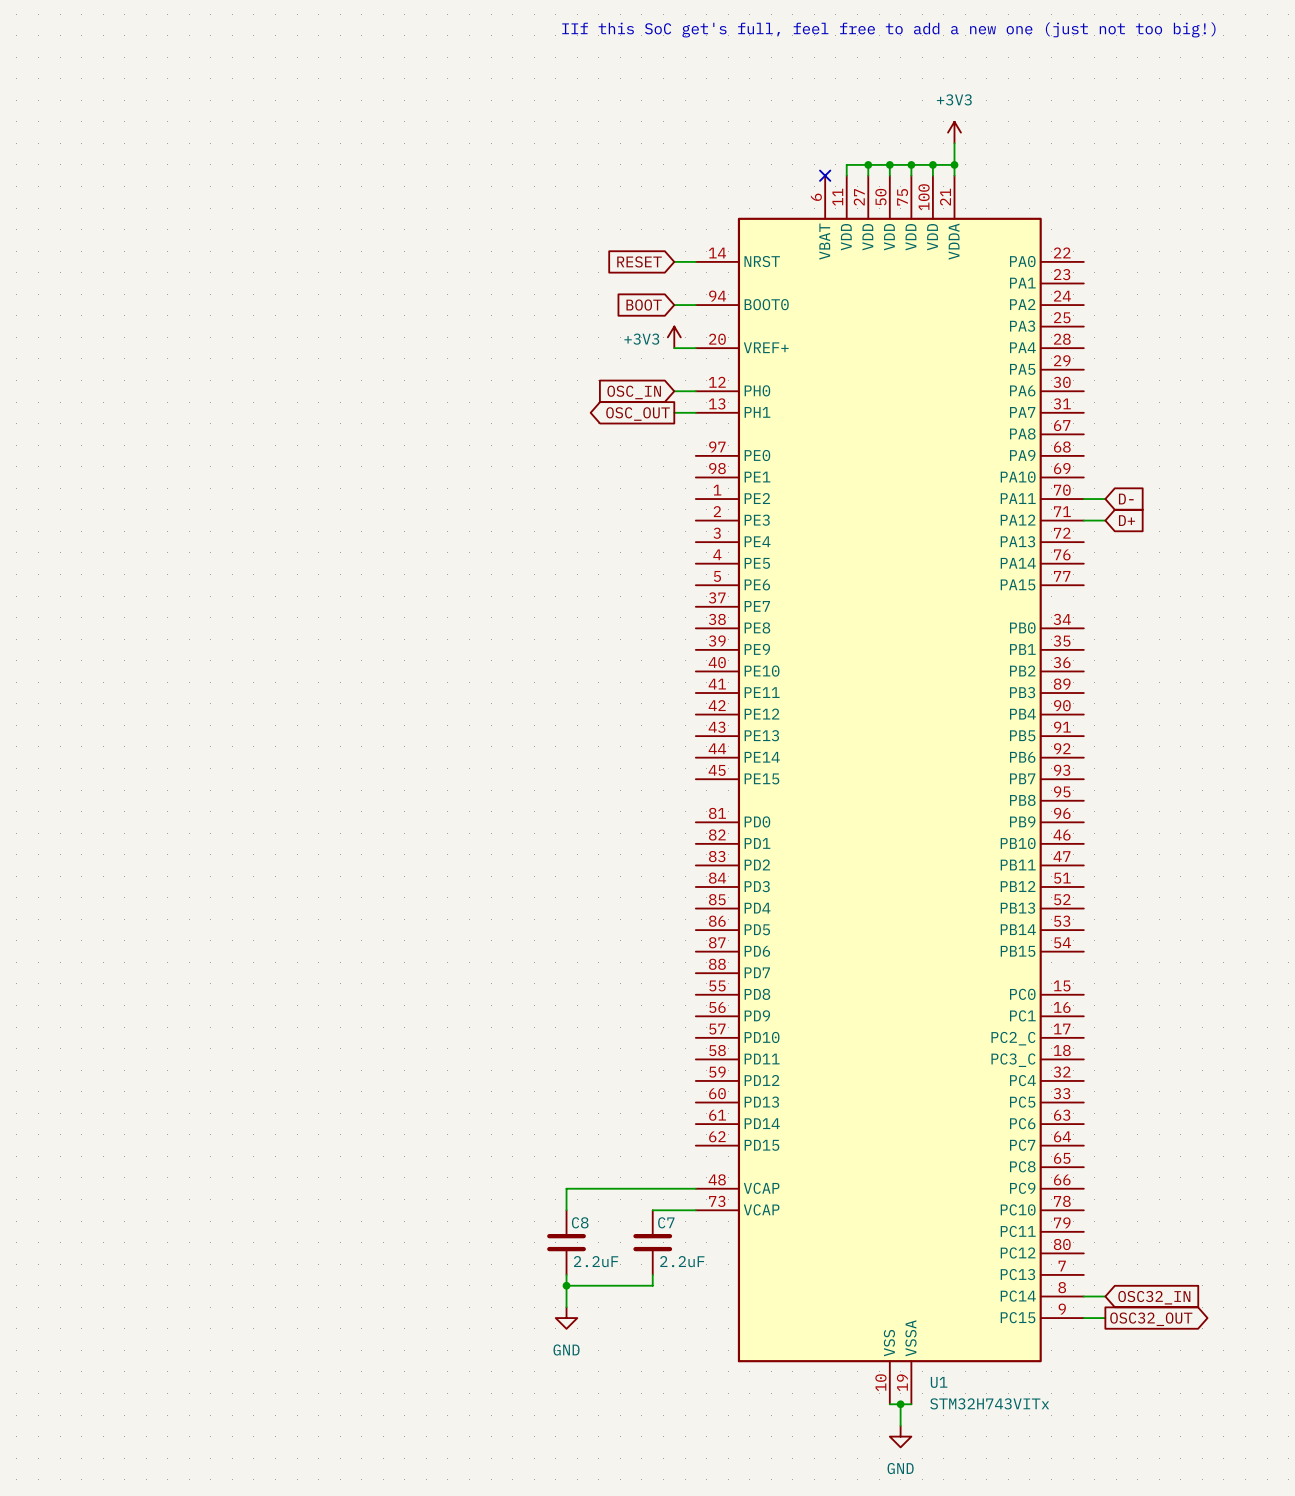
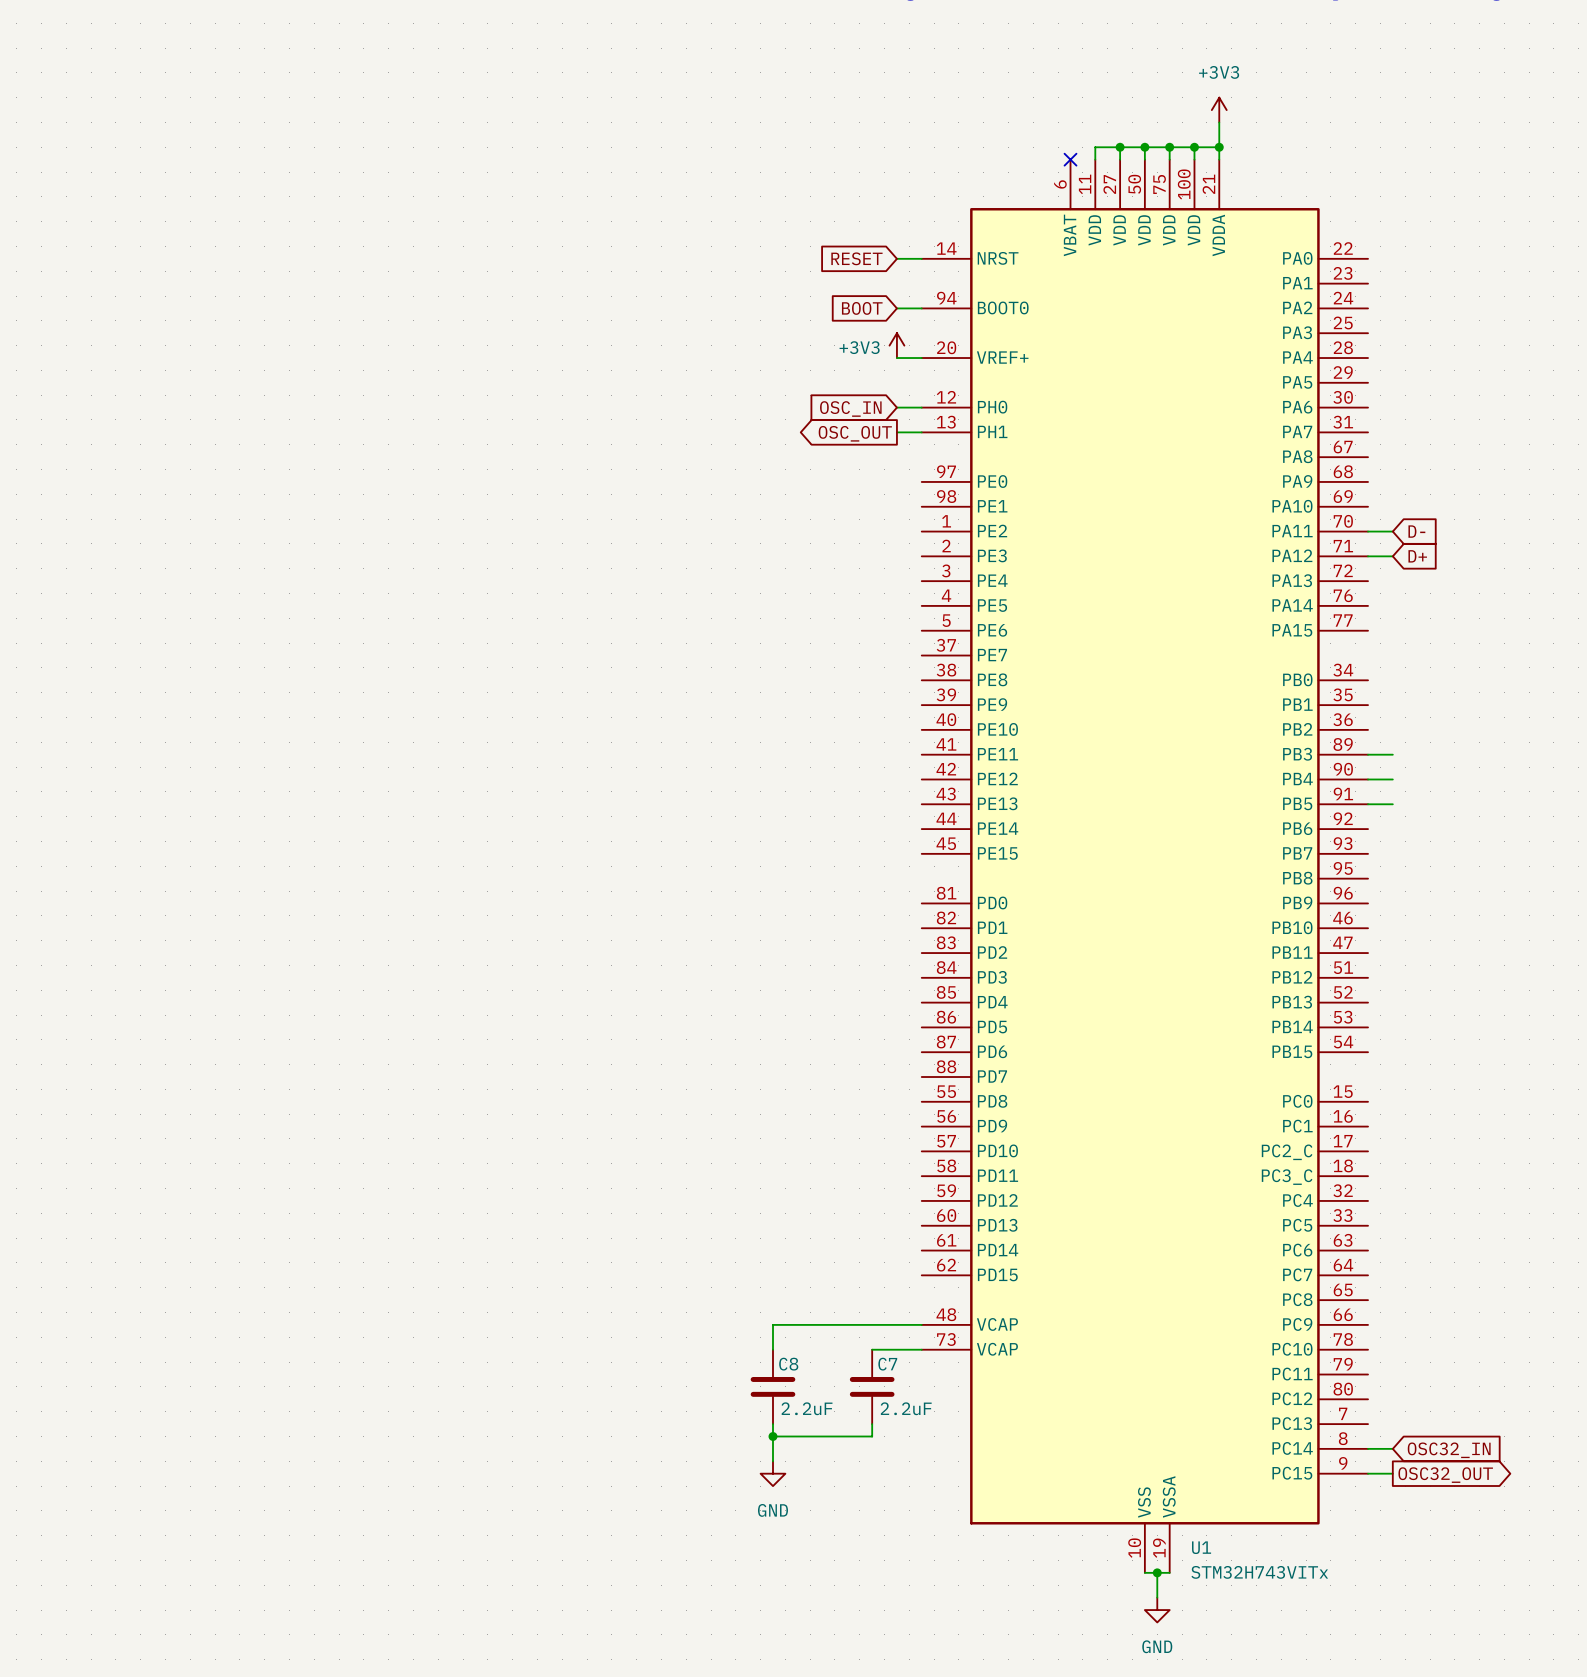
wire: none -> (1368, 754) (1392, 754)
wire: none -> (1368, 779) (1392, 779)
wire: none -> (1368, 804) (1392, 804)

